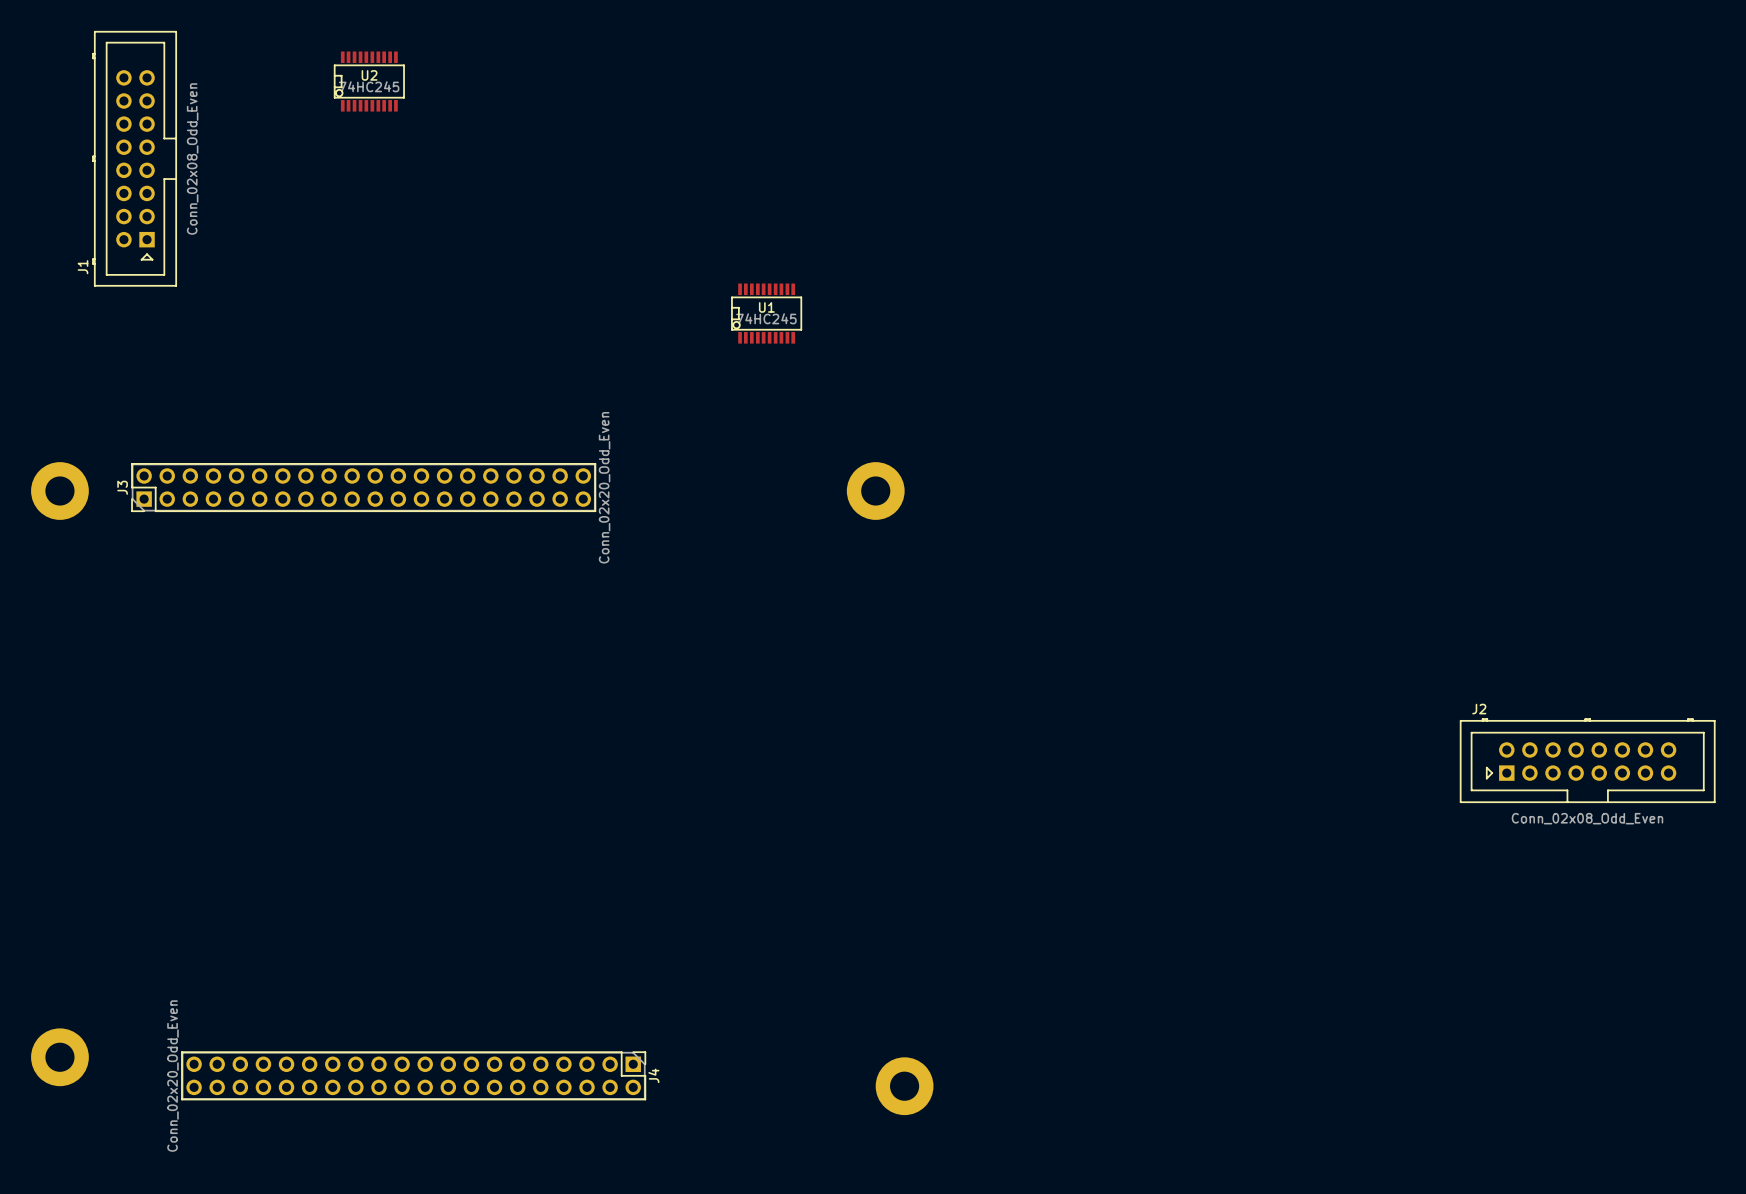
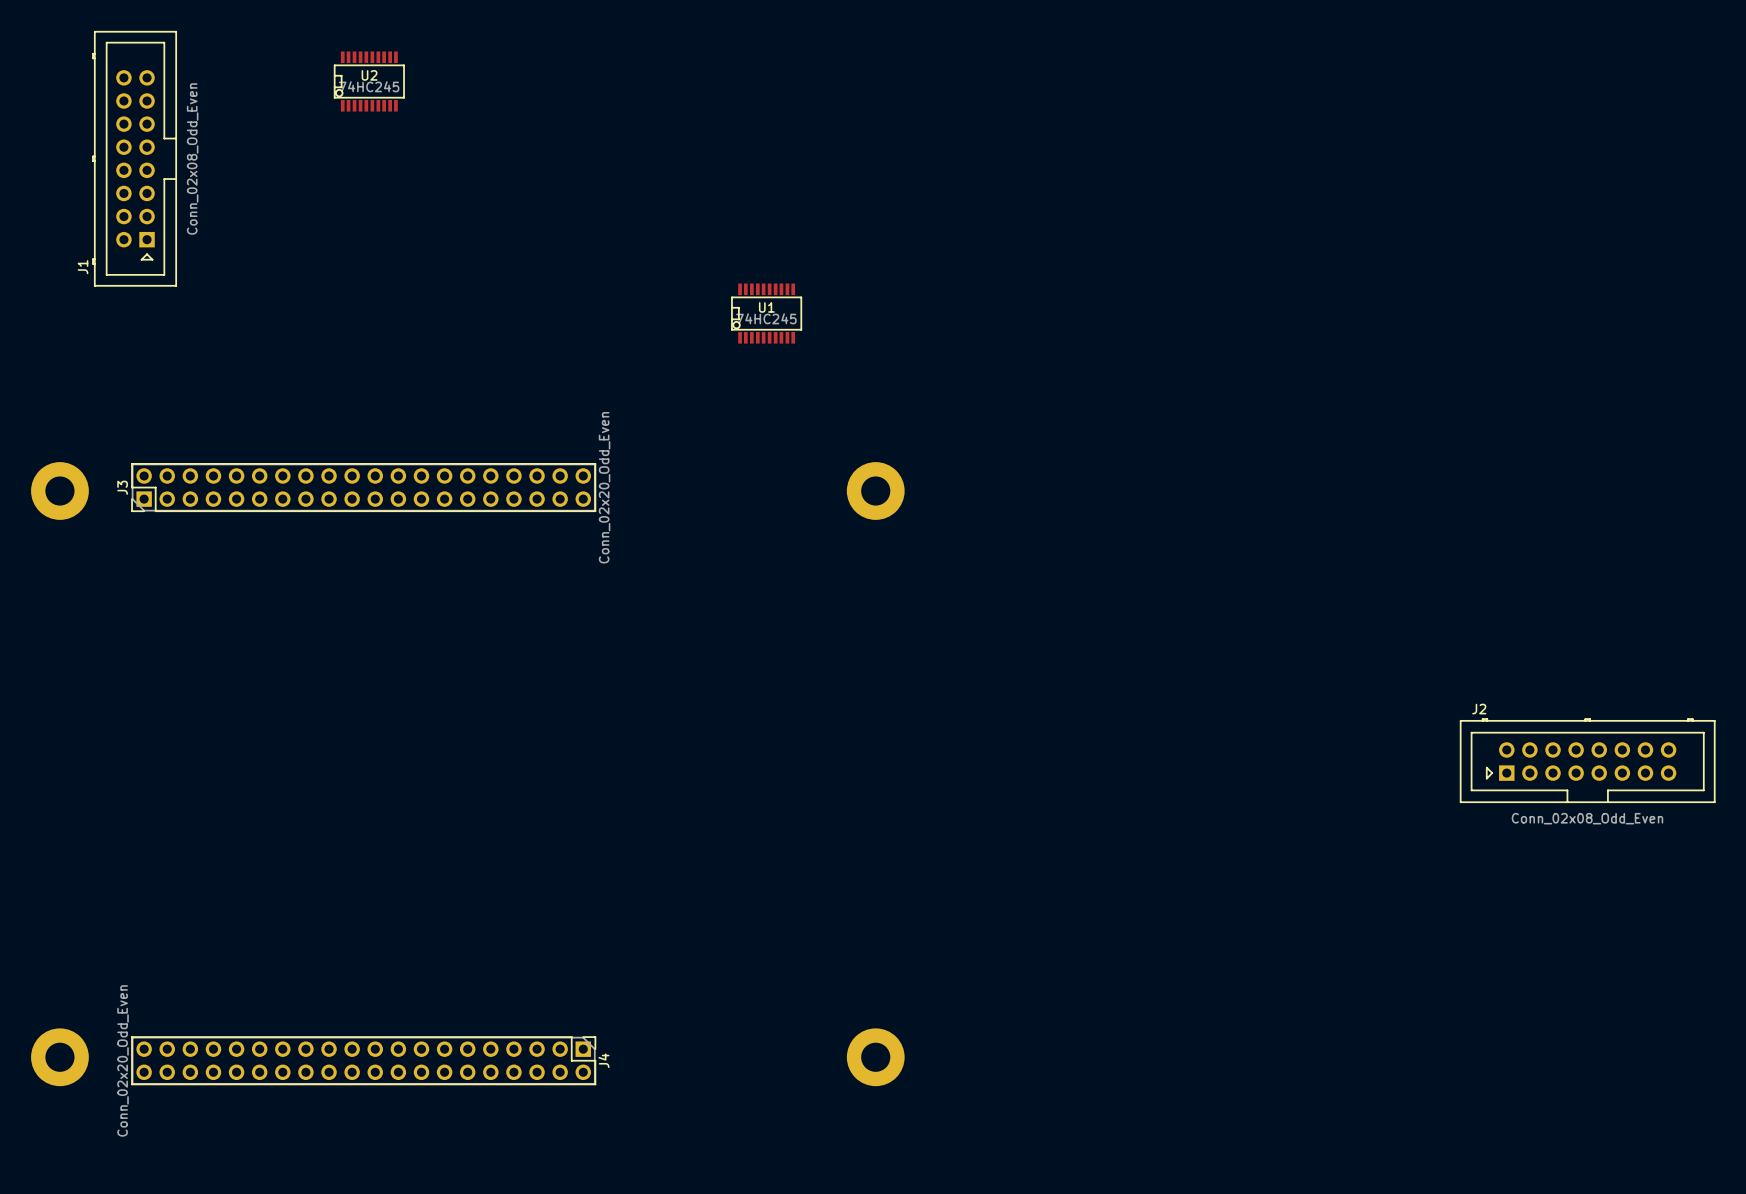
J4 position: (413, 1075) -> (363, 1060)
part position: (904, 1086) -> (875, 1057)

